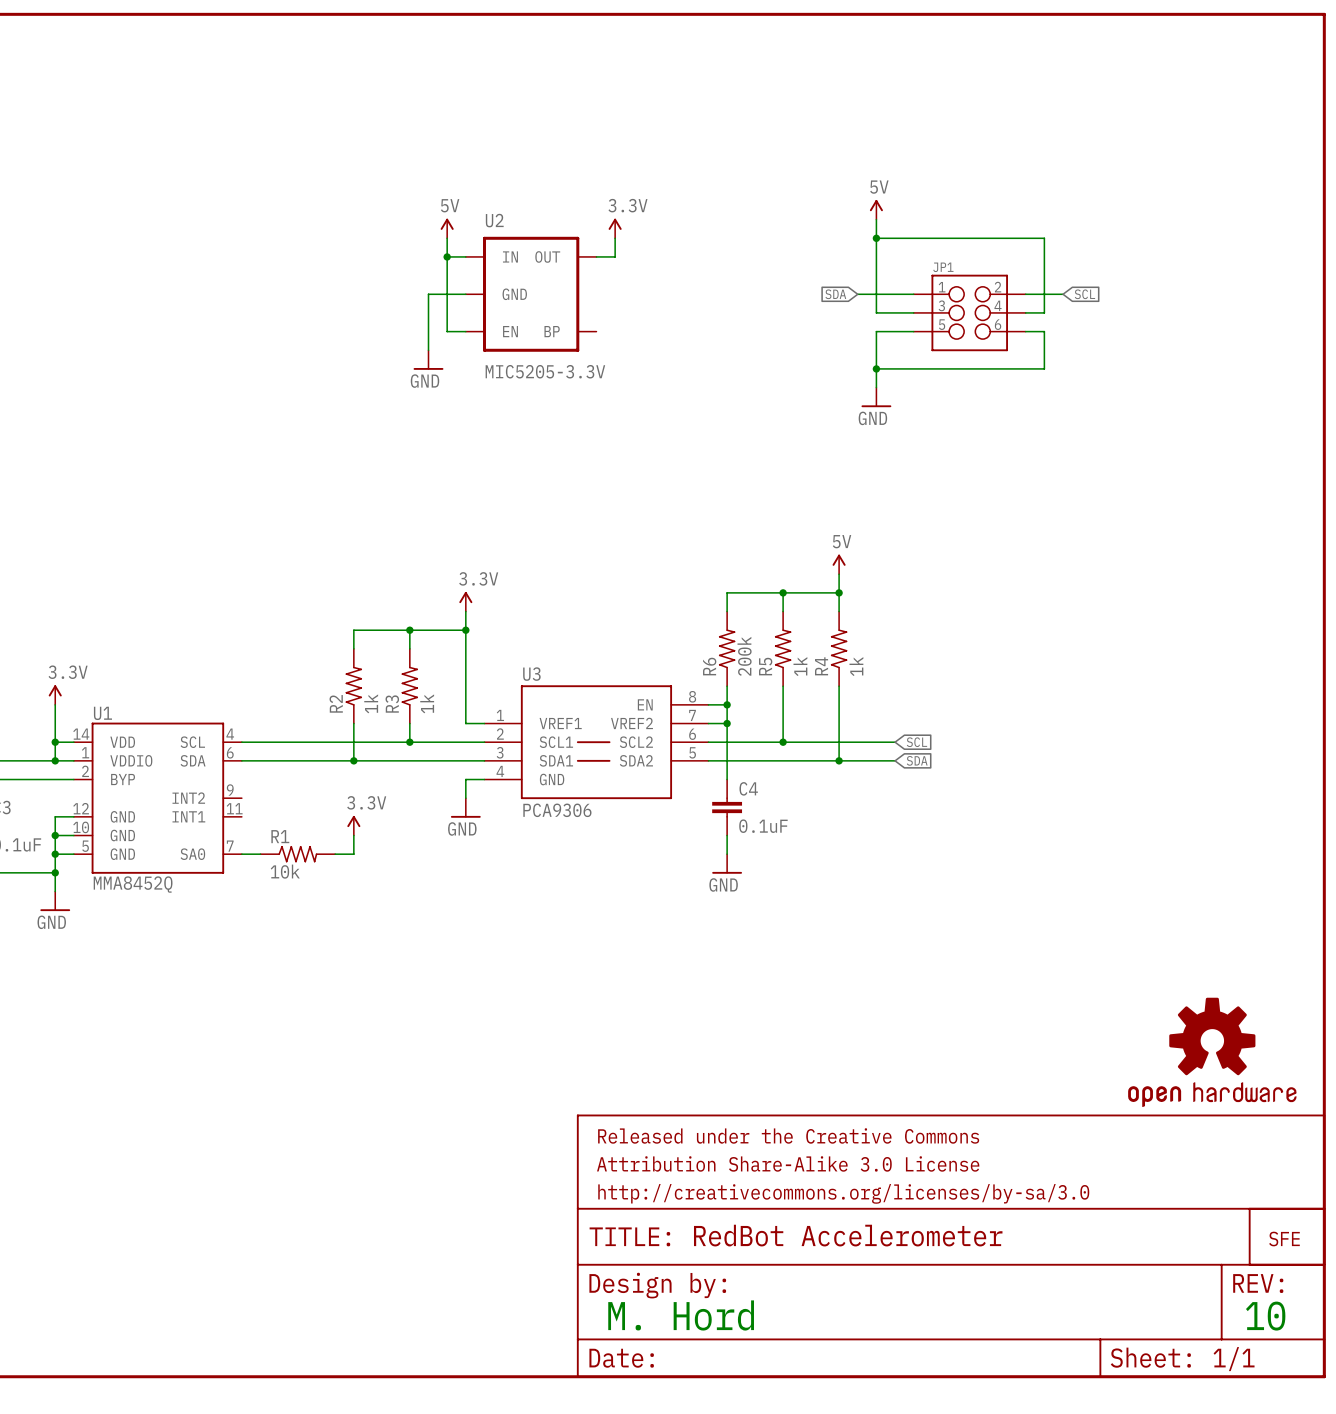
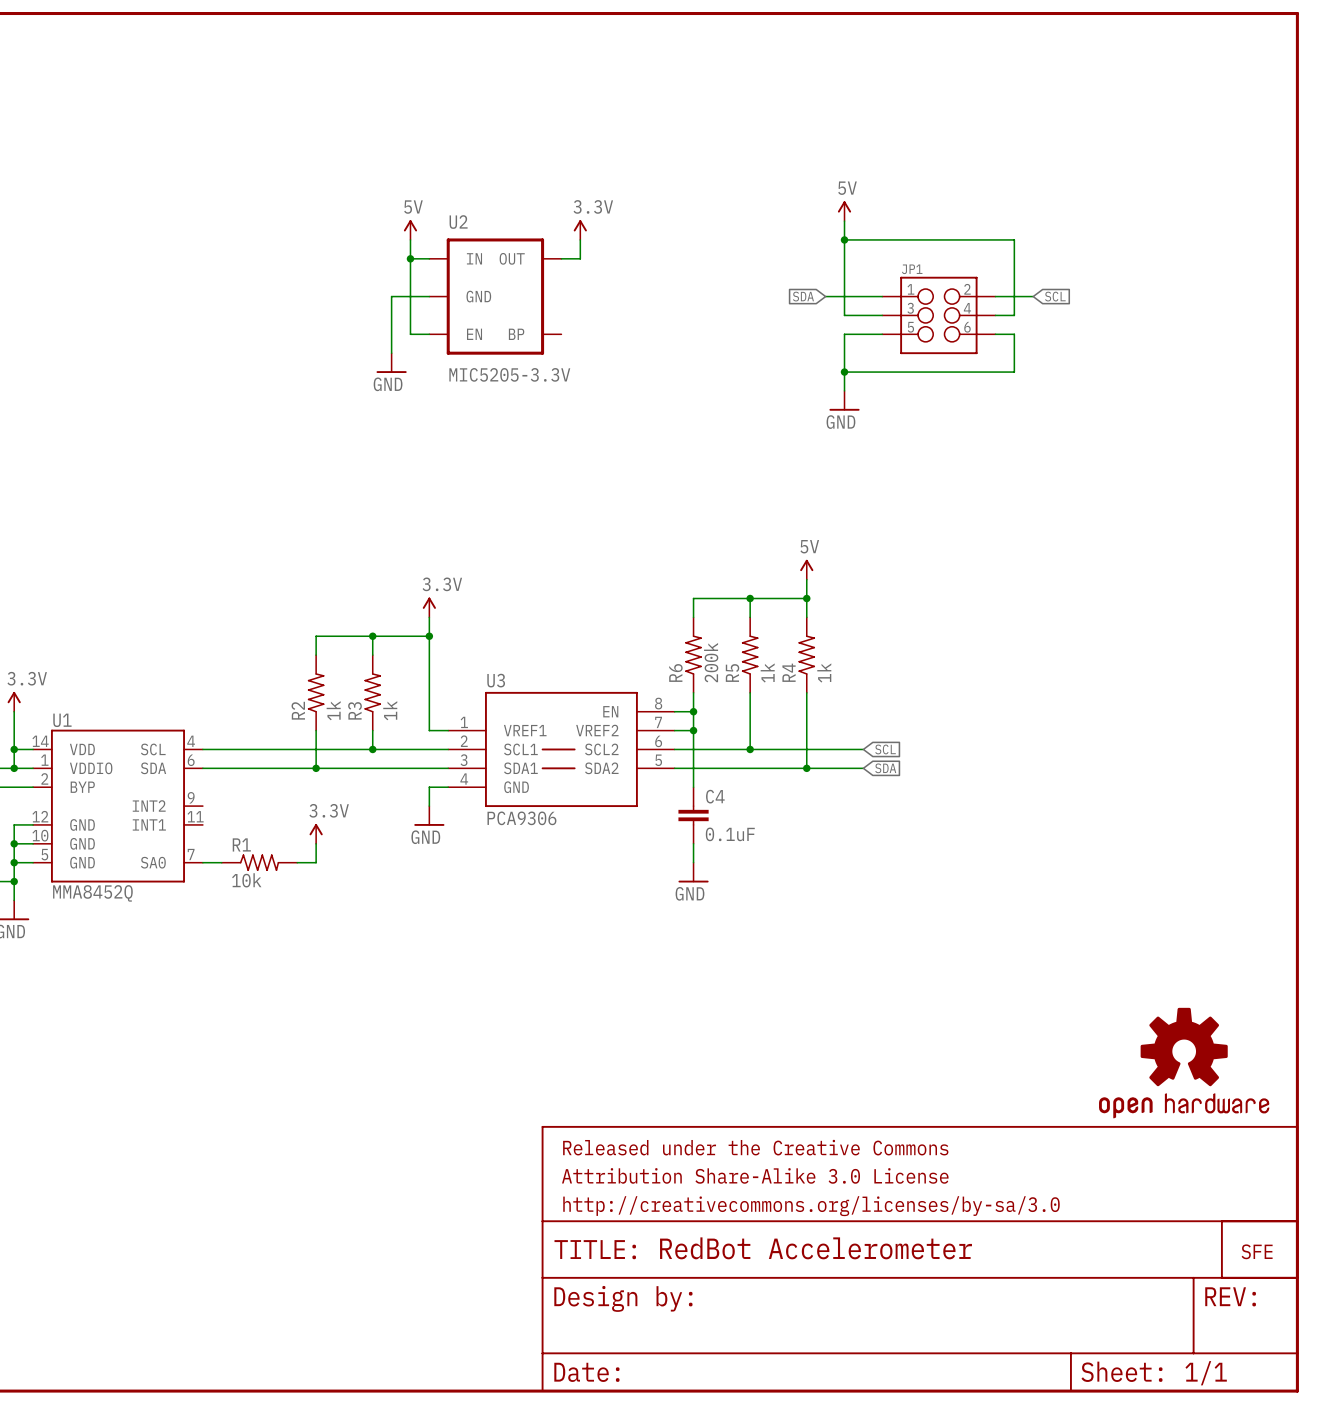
text: M. Hord (681, 1315) -> none
text: 10 (1265, 1316) -> none

